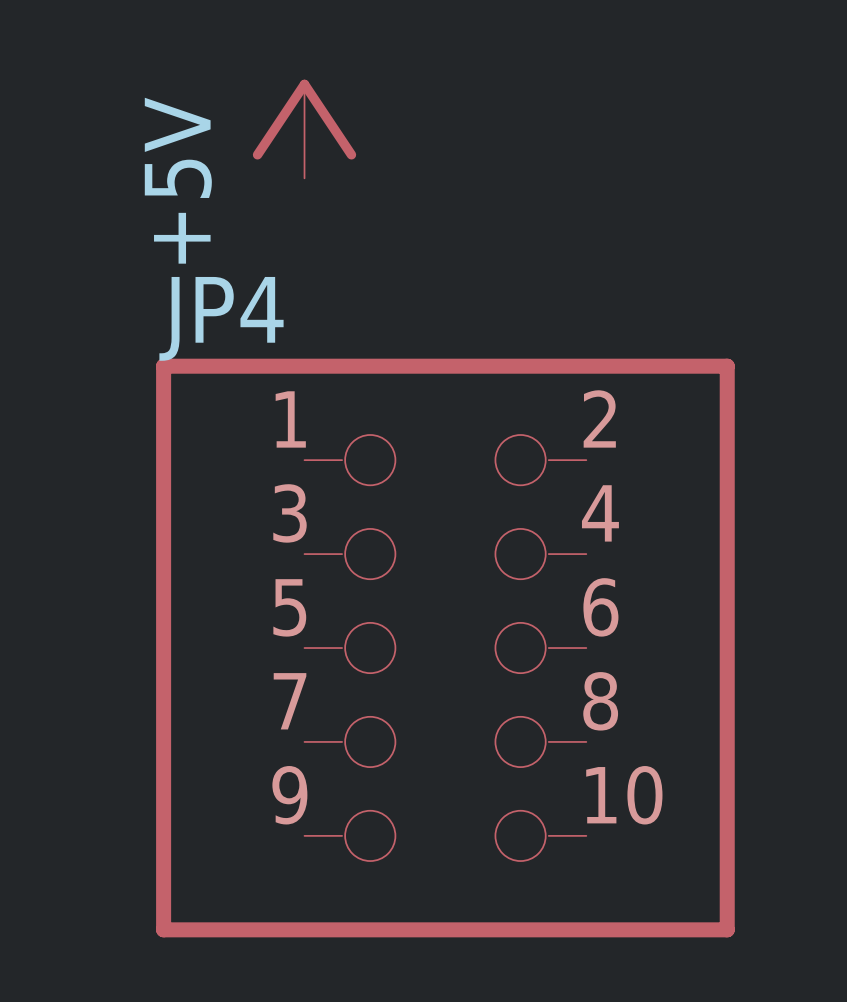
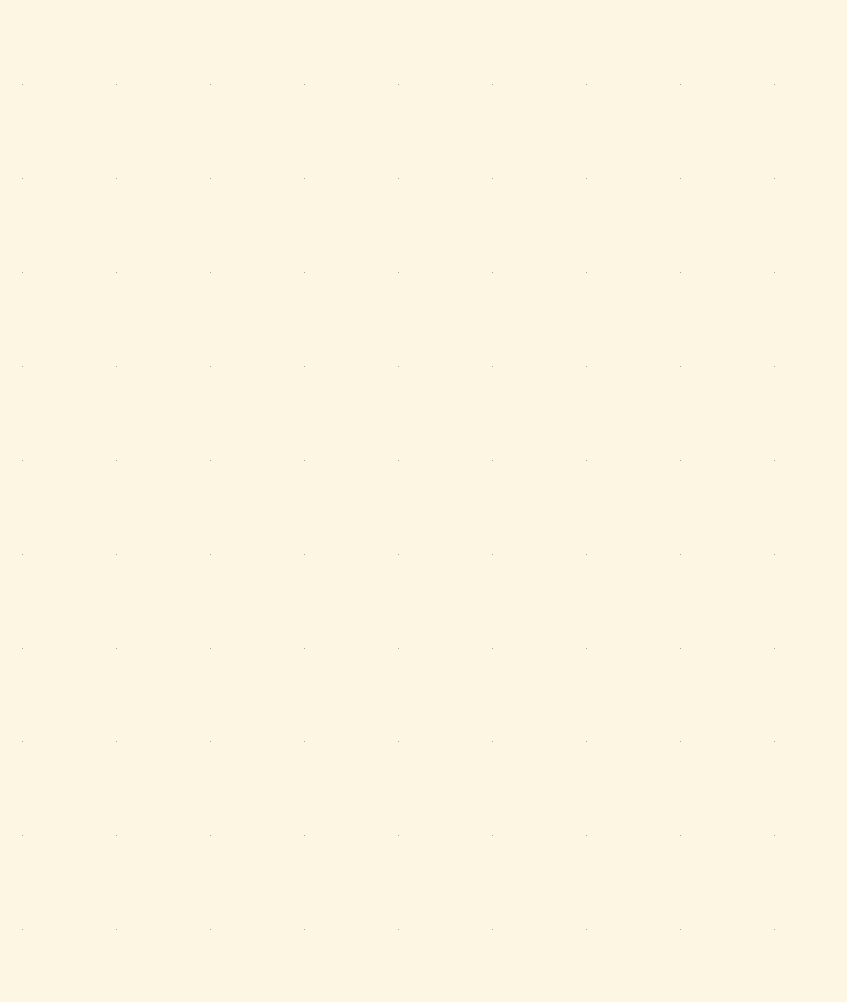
power symbol: +5V (304, 129) -> none
JP4: (445, 648) -> none

